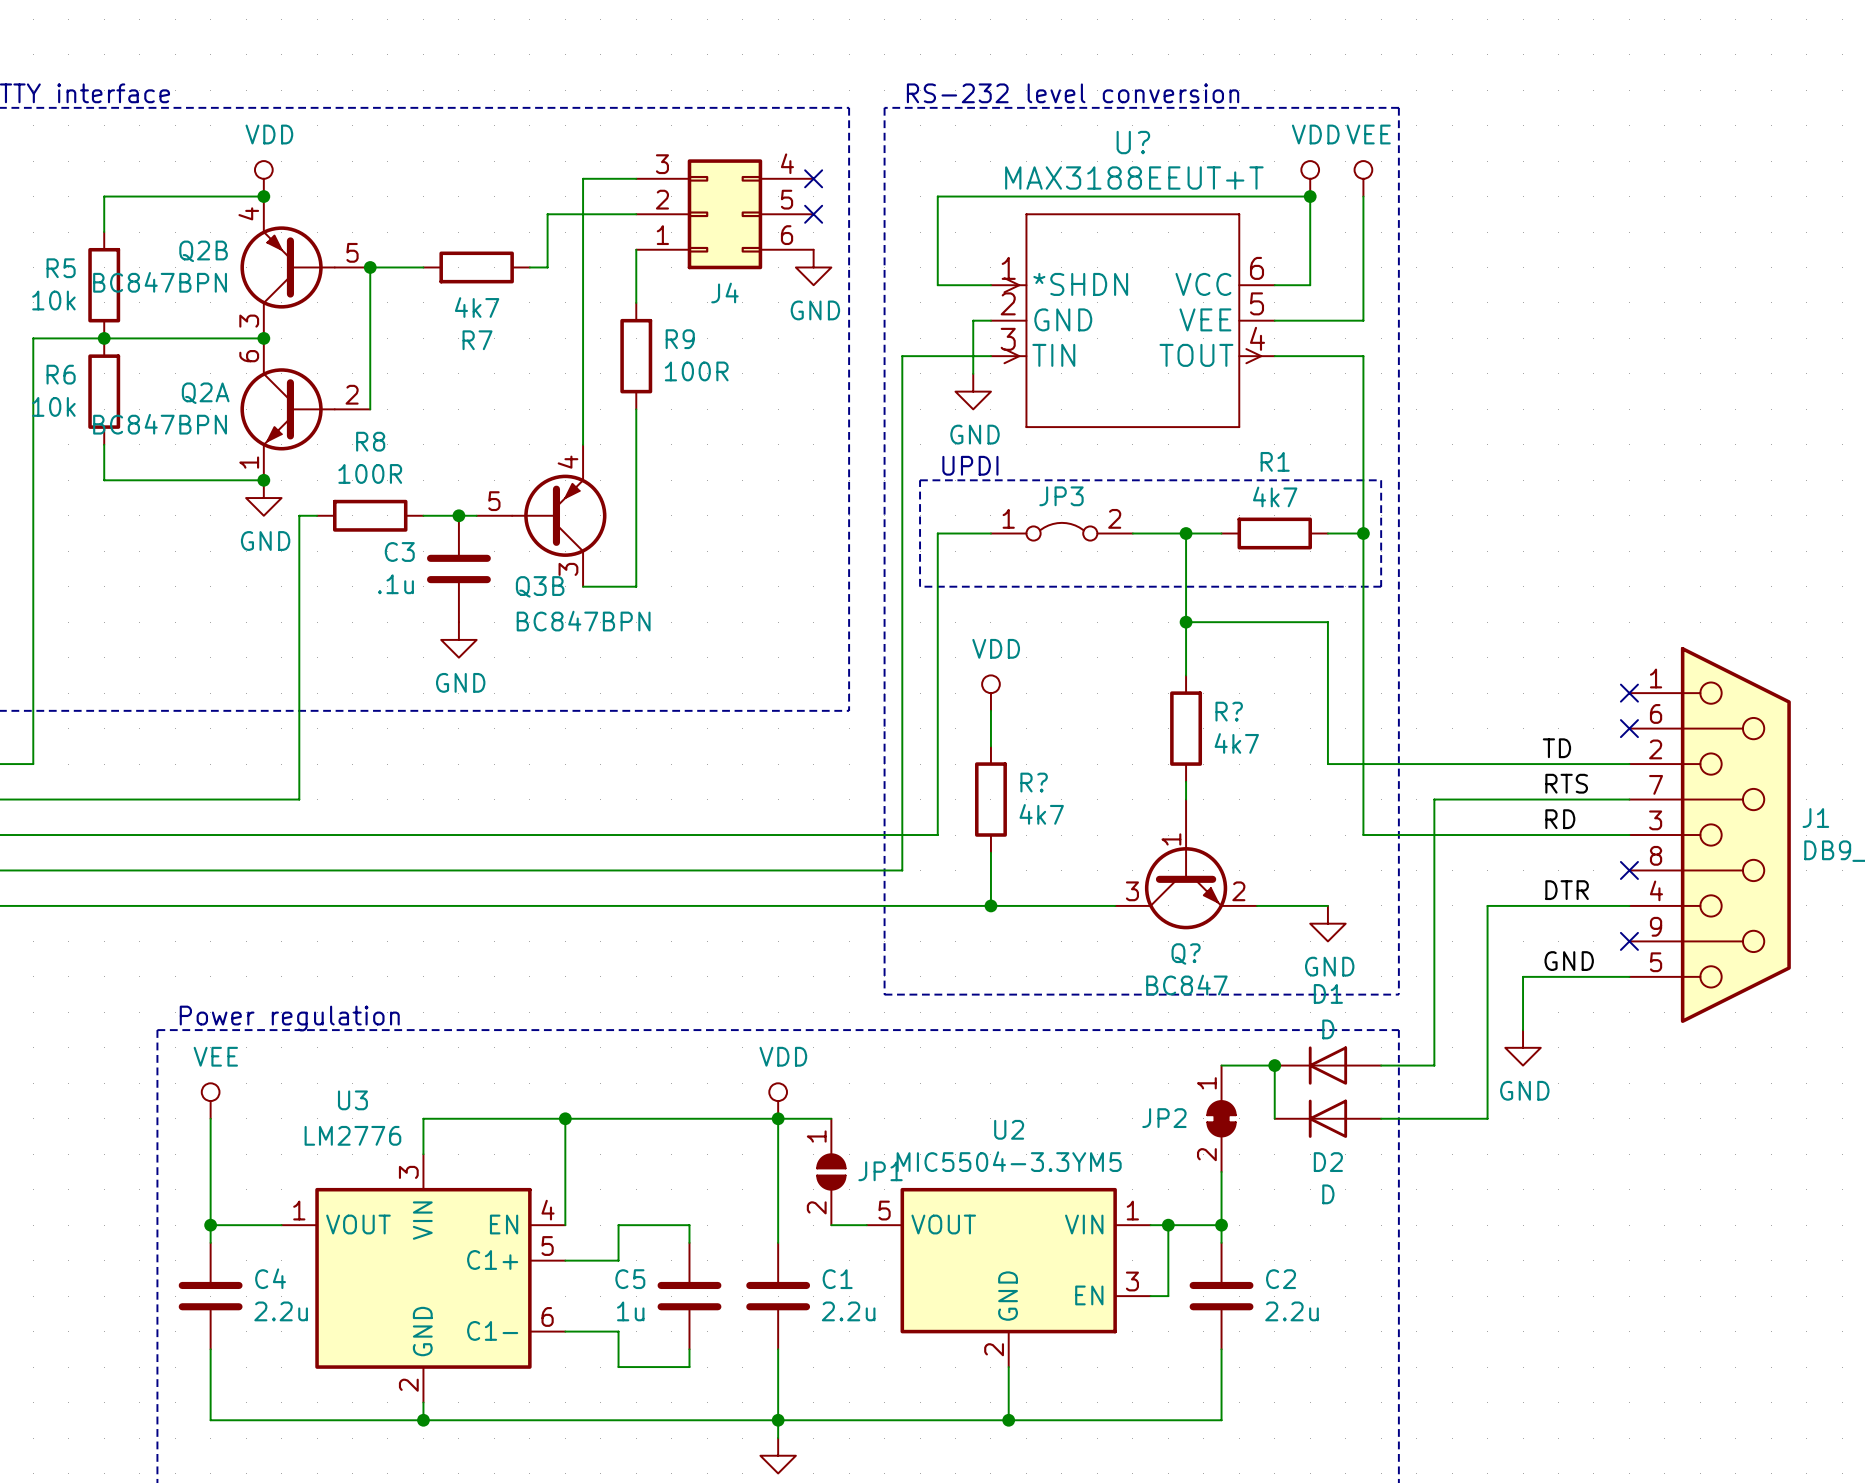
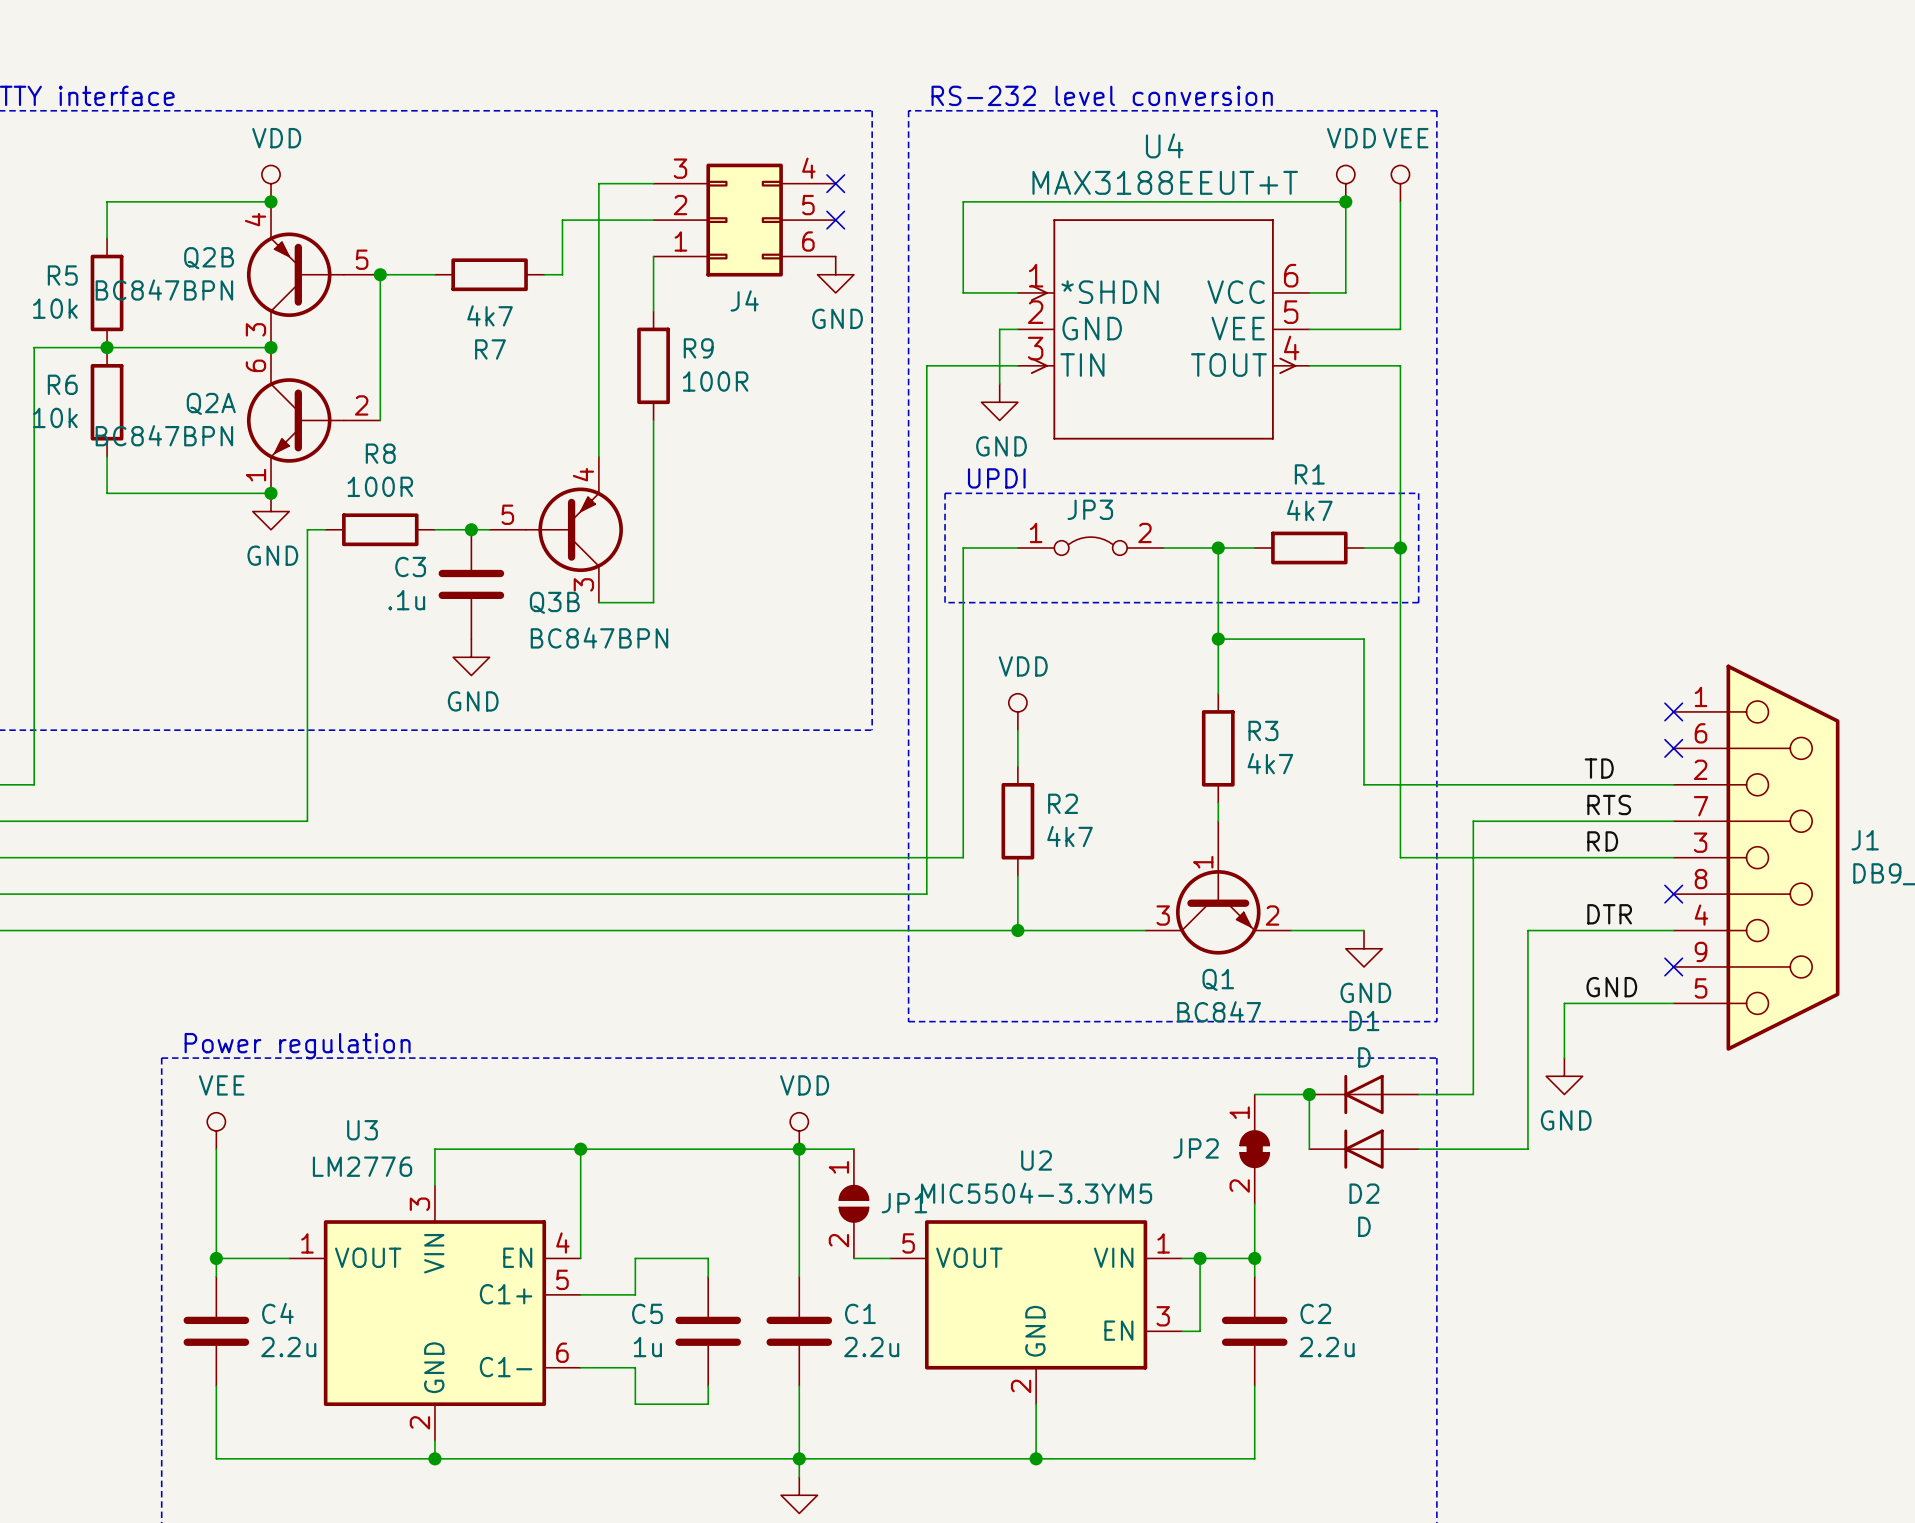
U? name: U? (1133, 142) -> U4 (1164, 145)
R? name: R? (1229, 711) -> R3 (1263, 730)
R? name: R? (1034, 782) -> R2 (1063, 803)
Q? name: Q? (1186, 954) -> Q1 (1218, 979)

